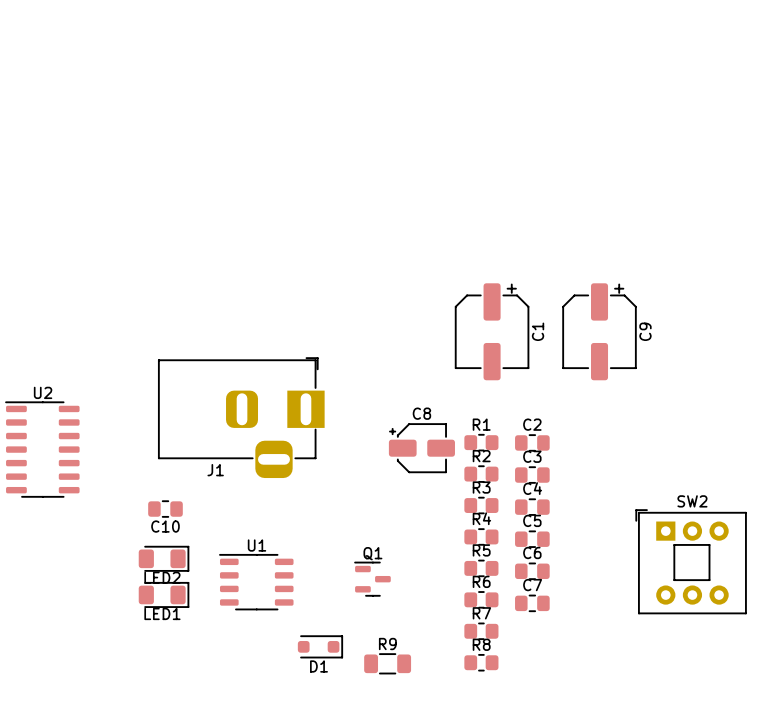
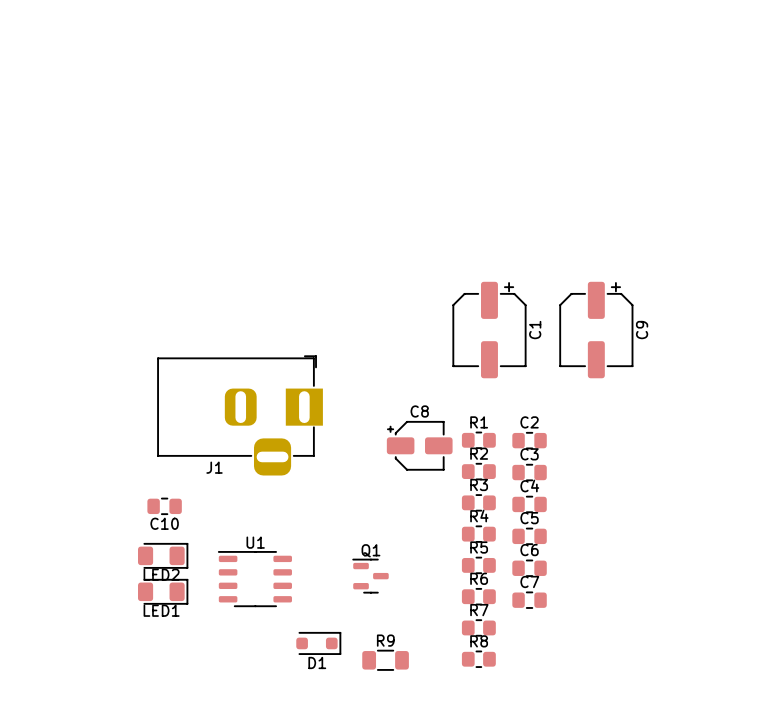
U2: (42, 449) -> none
SW2: (691, 561) -> none

